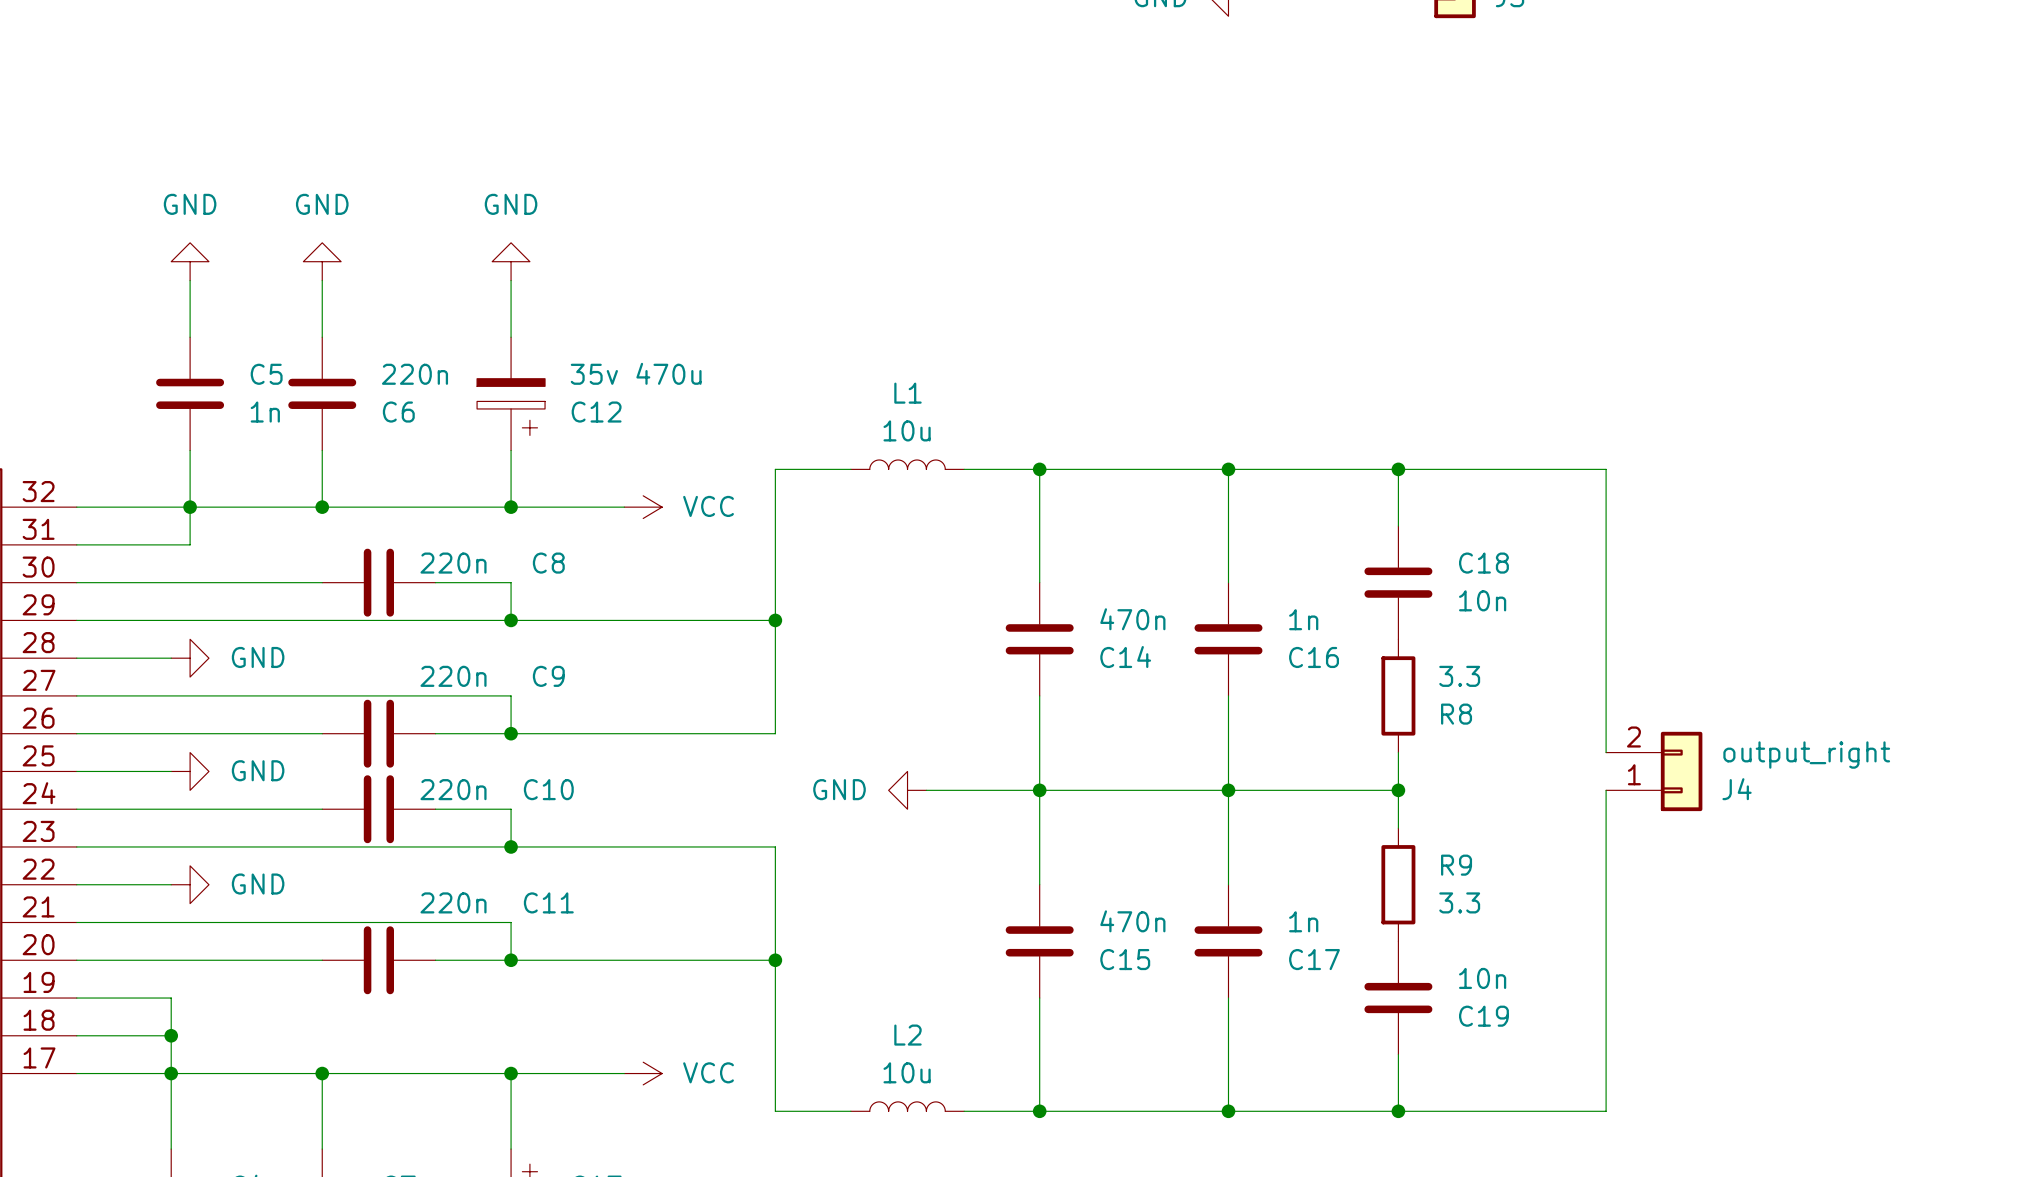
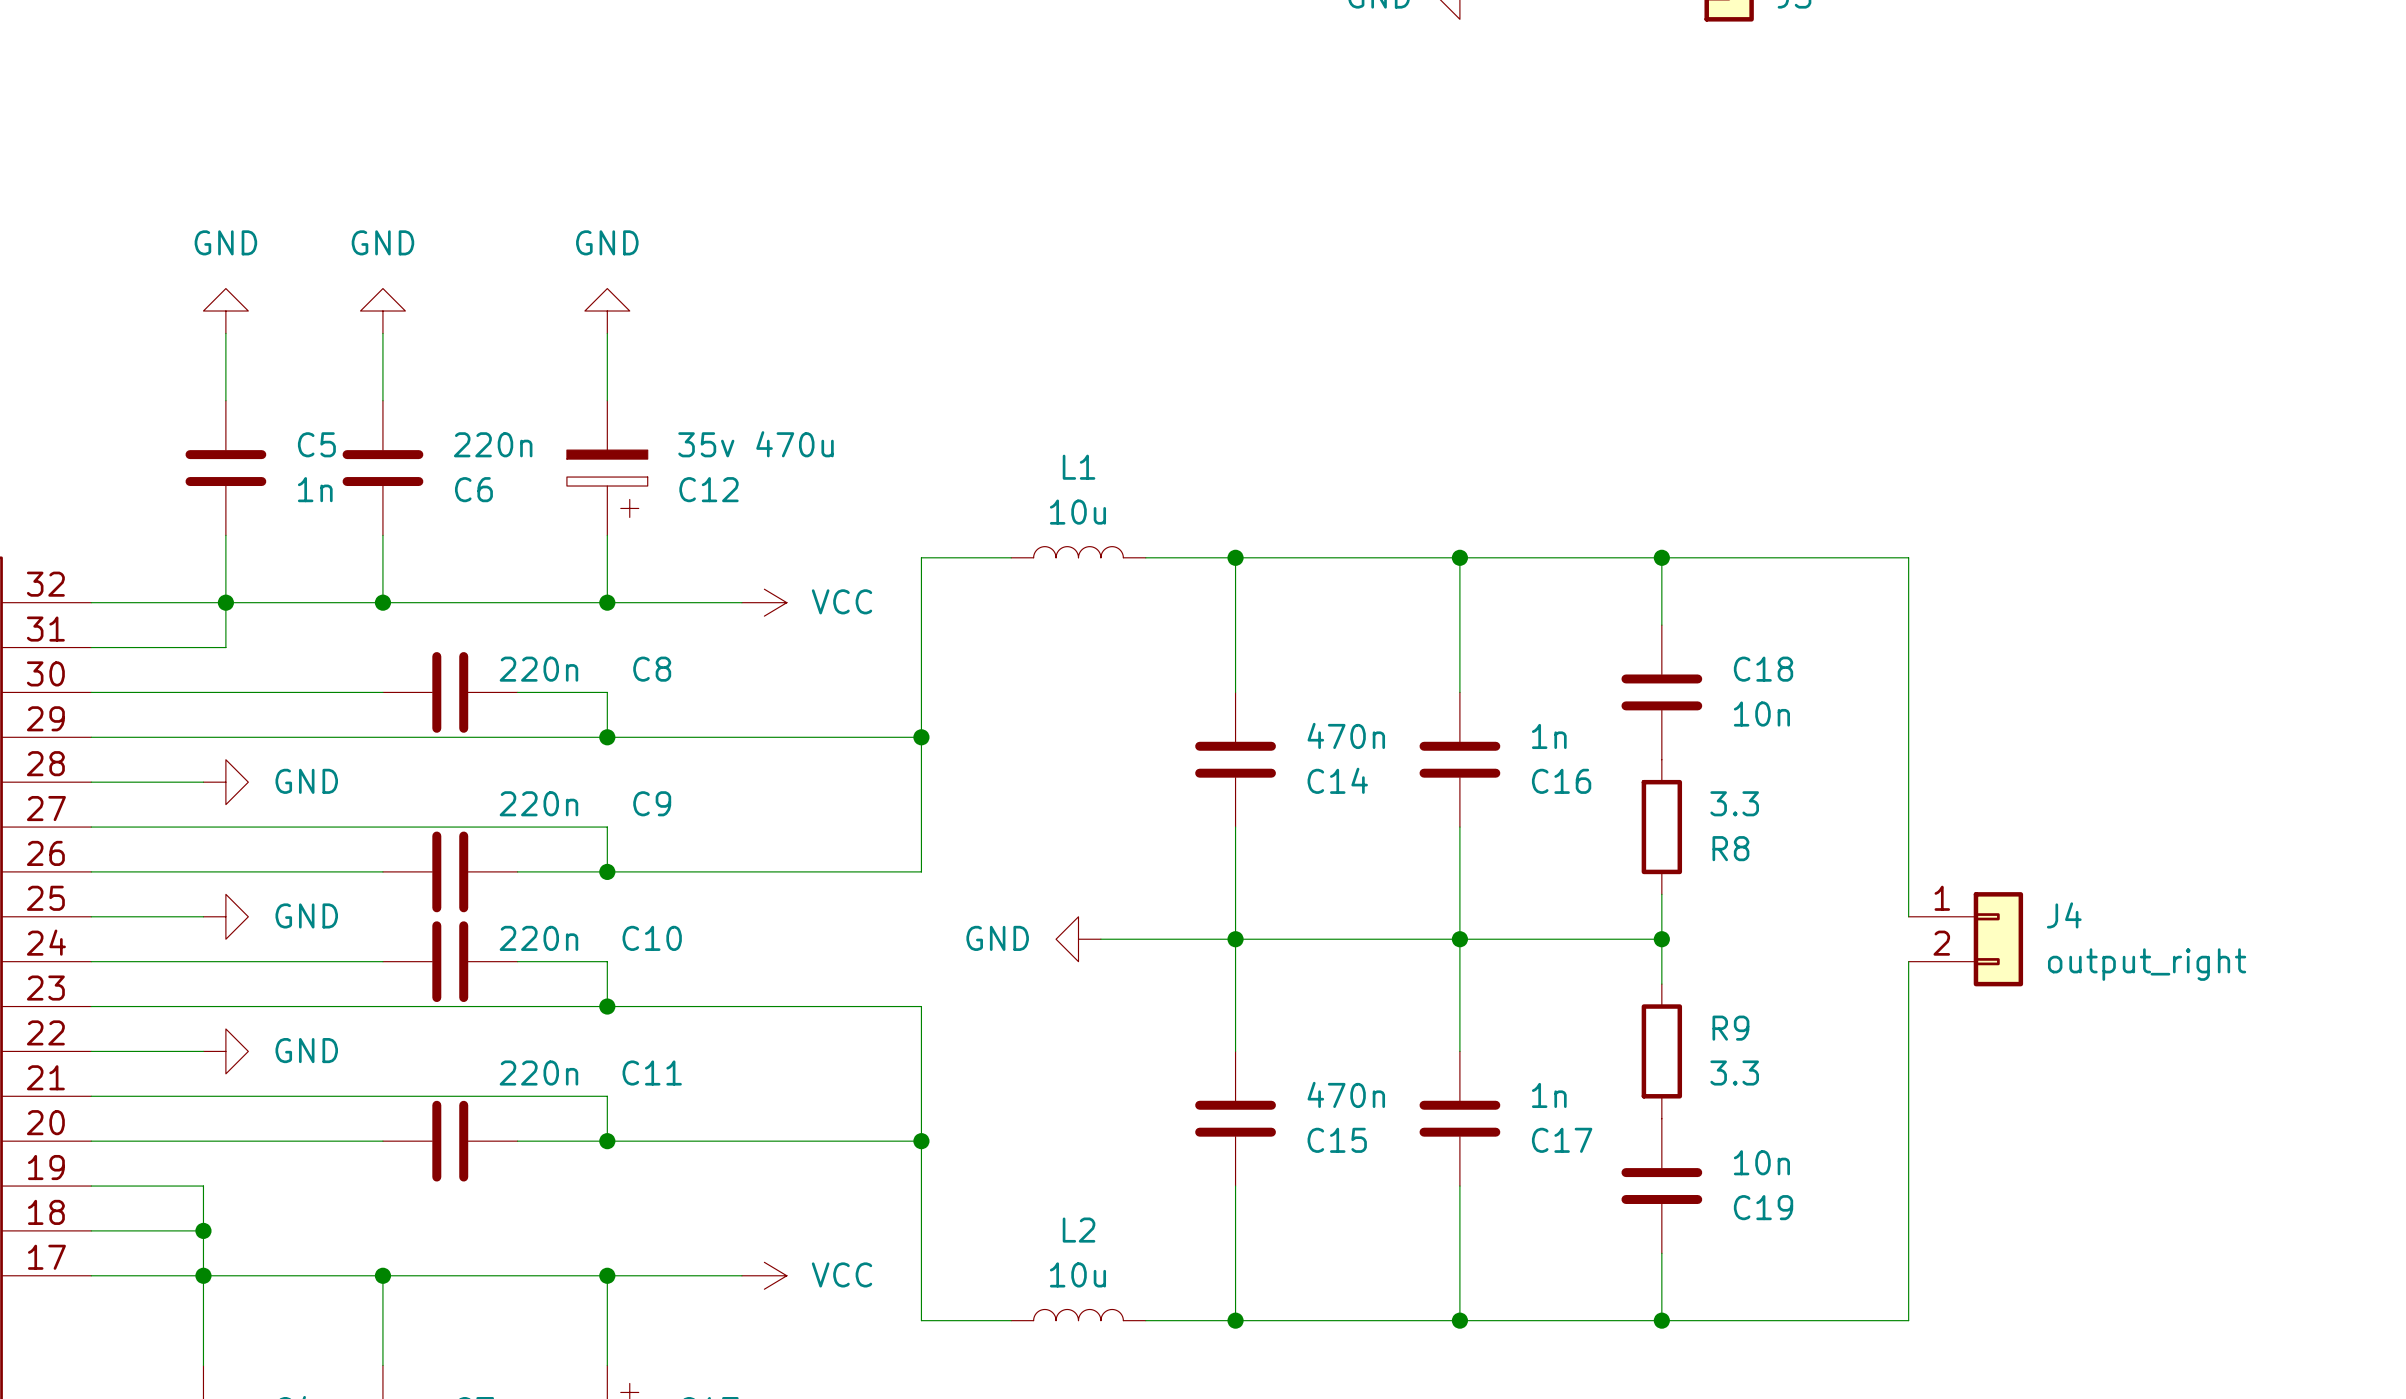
J4 flip: as is (1681, 771) -> up-down (1998, 939)
wire: (1606, 790) (1606, 809) -> (1908, 894) (1908, 916)

